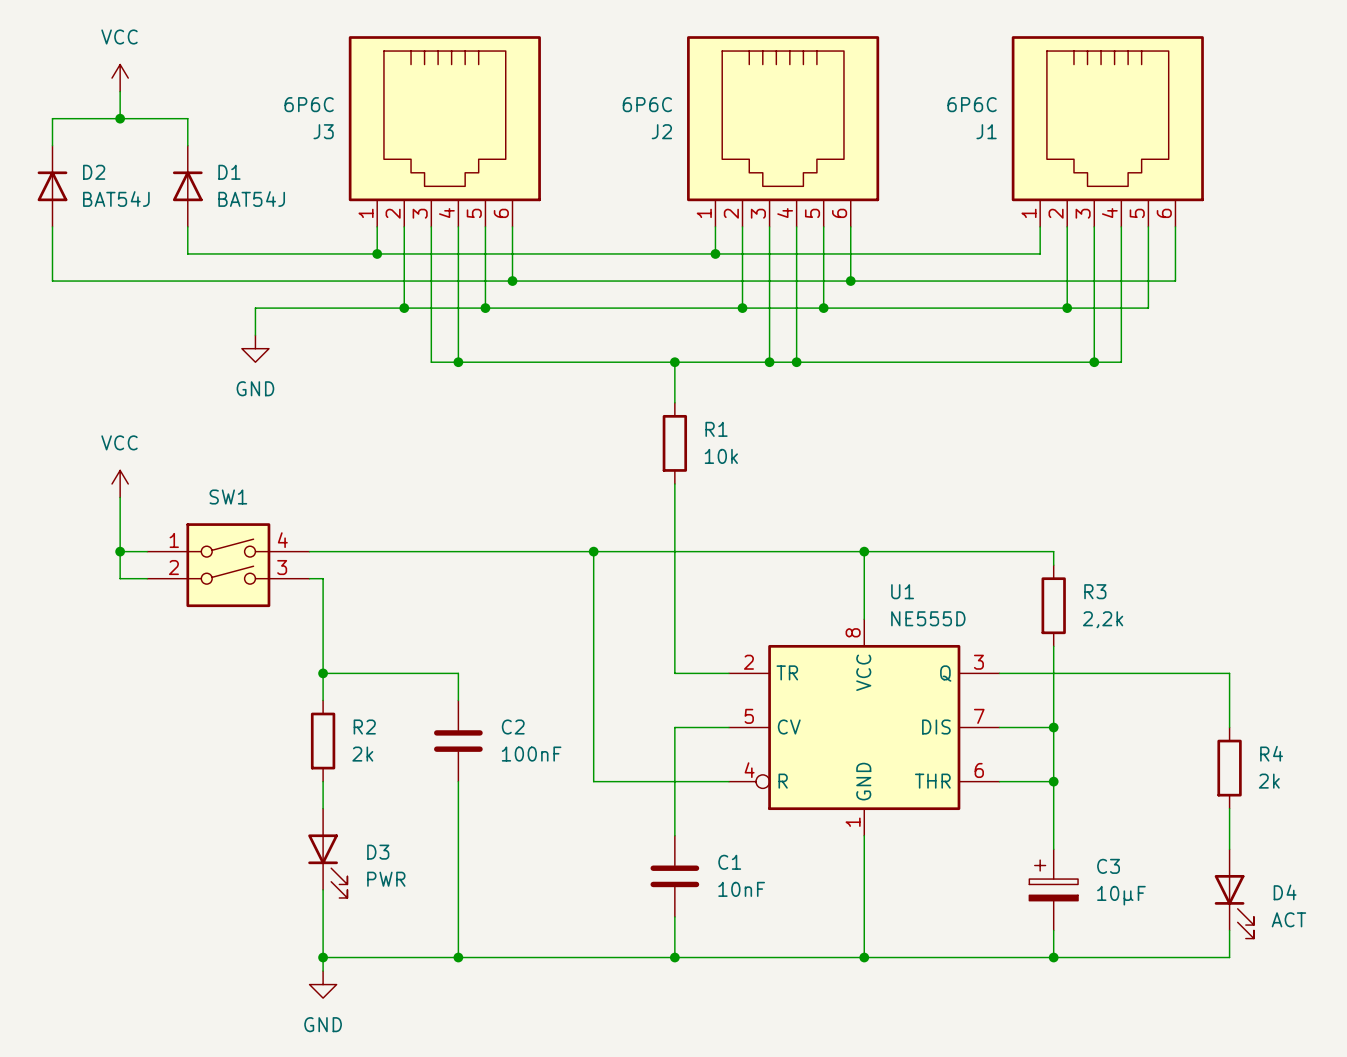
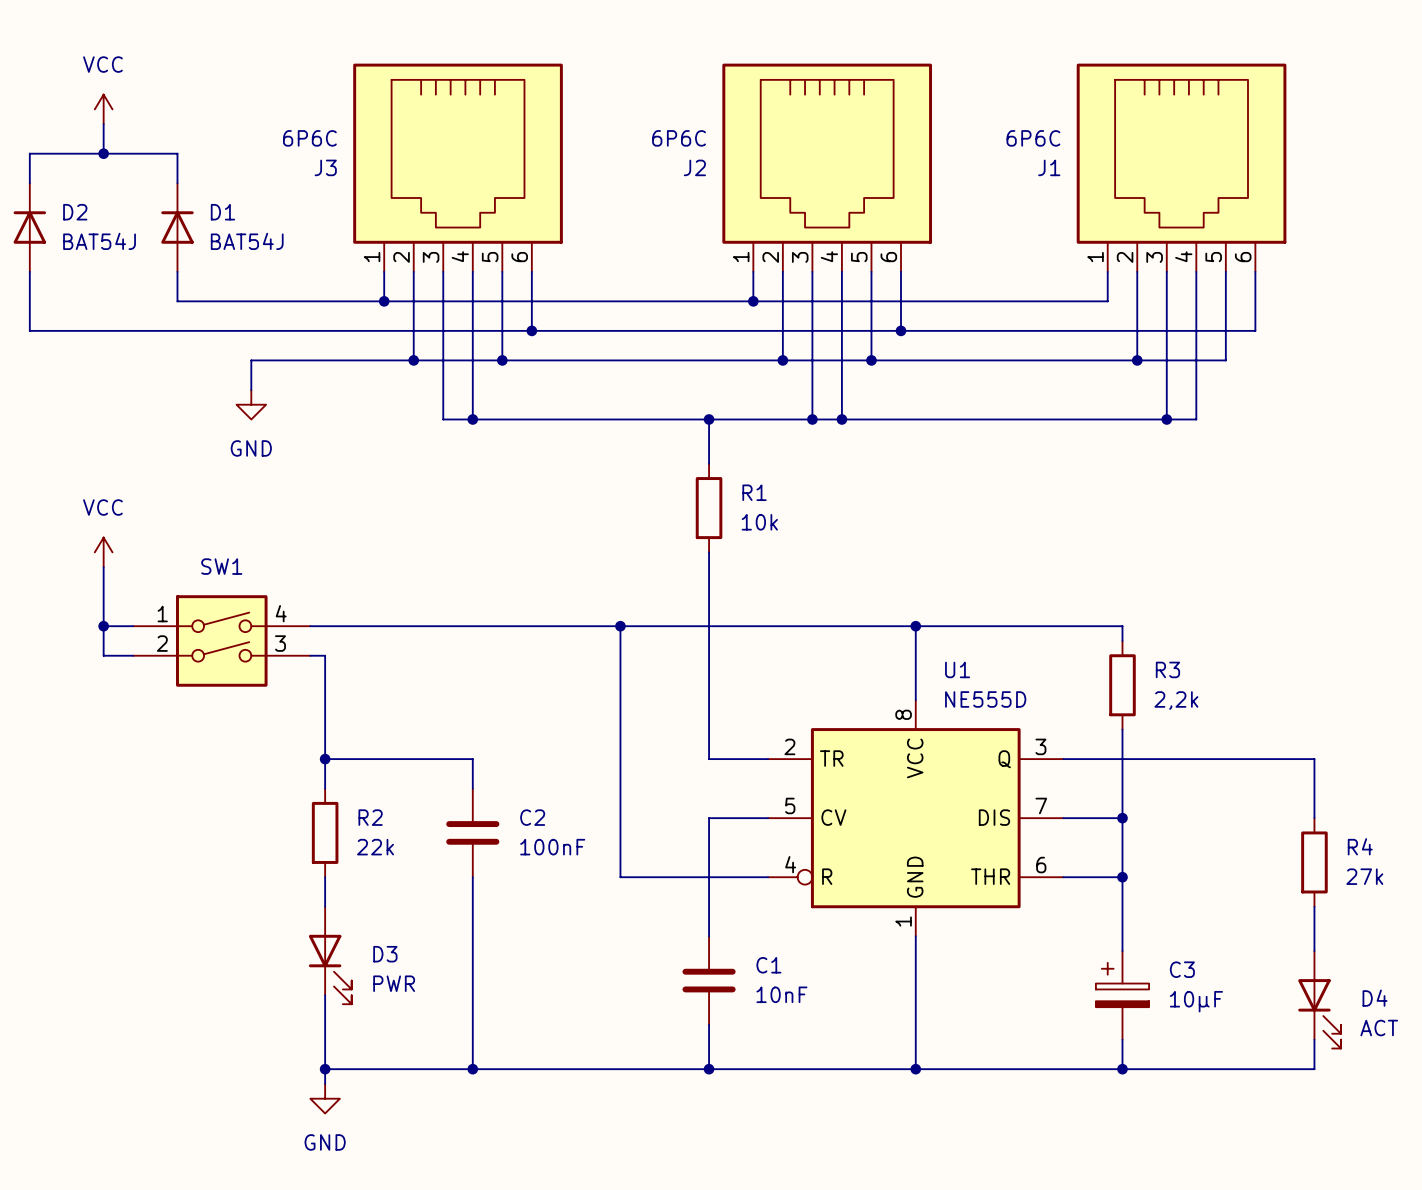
R2 value: 2k (362, 754) -> 22k (375, 847)
R4 value: 2k (1269, 781) -> 27k (1364, 876)

